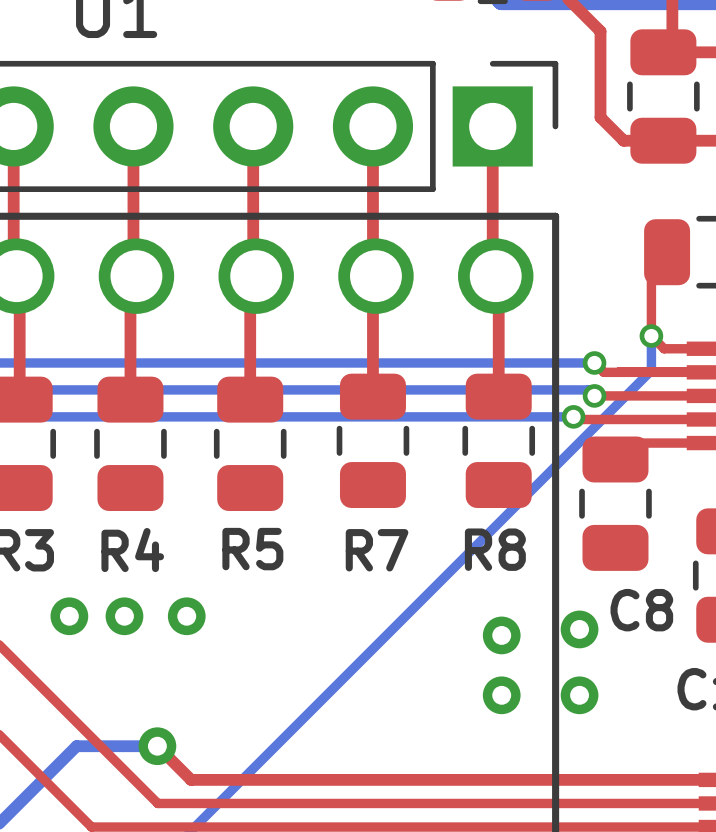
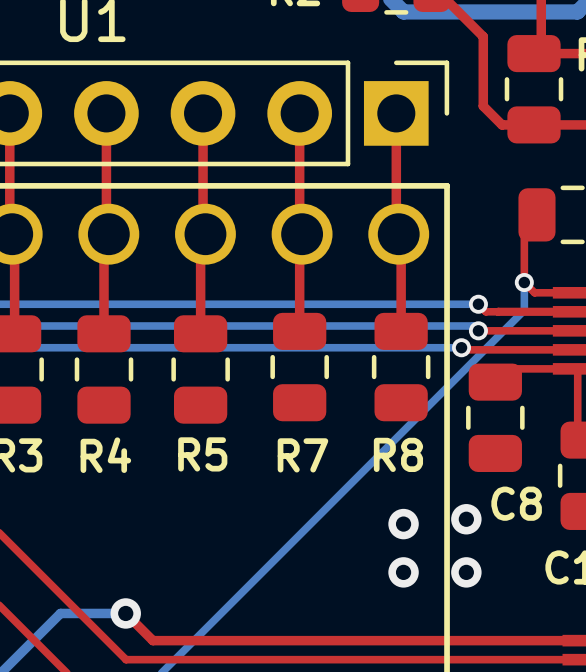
via: (69, 616) -> none
via: (124, 616) -> none
via: (186, 616) -> none

